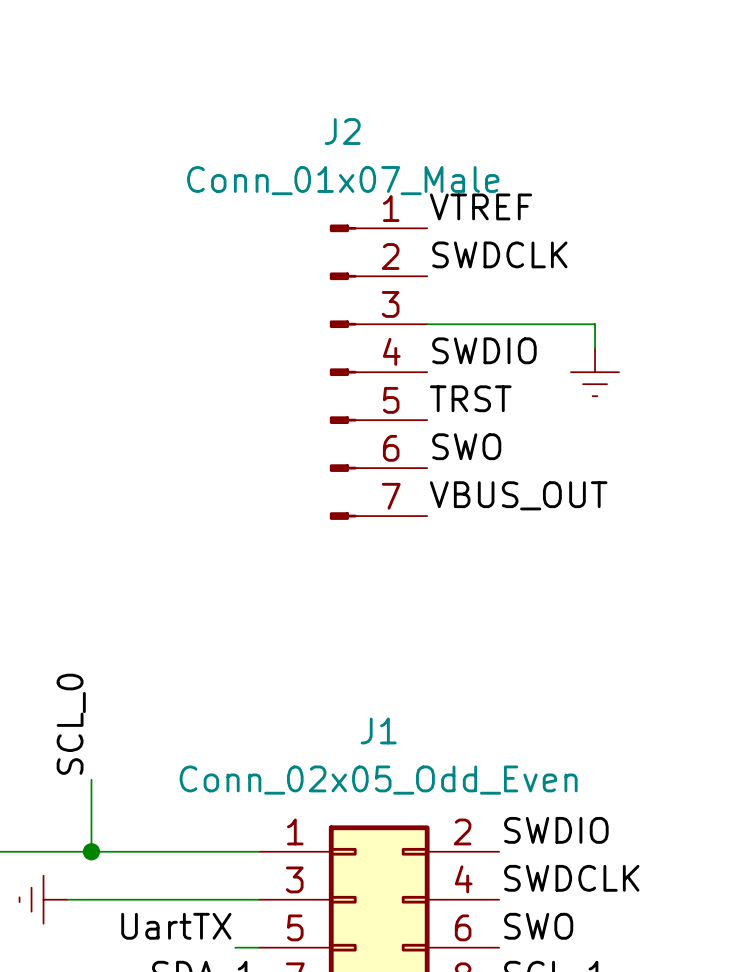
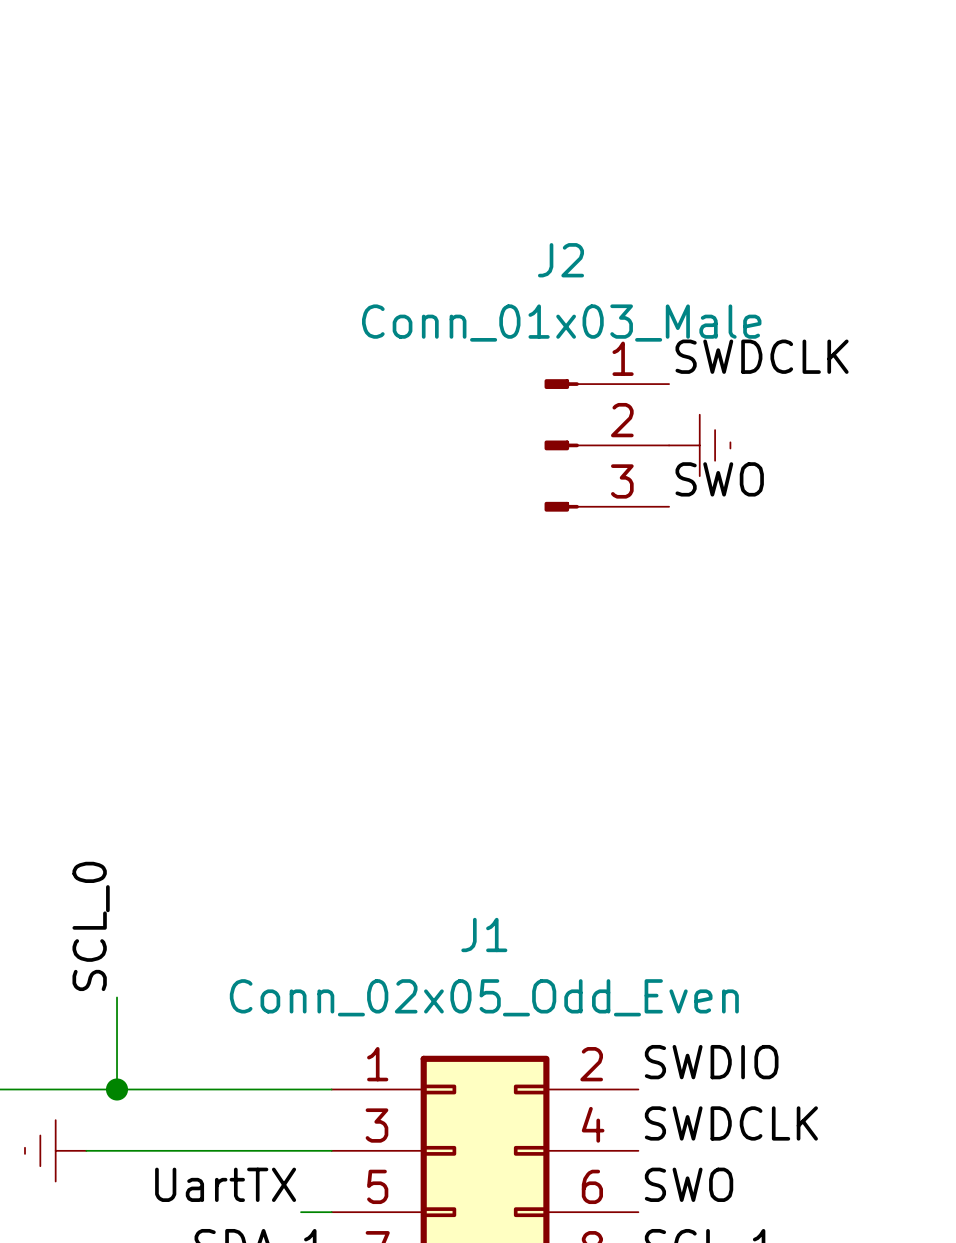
J2 name position: J2 (342, 131) -> J2 (561, 260)
J2 value: Conn_01x07_Male (343, 180) -> Conn_01x03_Male (561, 323)
label: VTREF (481, 206) -> none
J2 symbol: [329, 224, 428, 520] -> [544, 379, 670, 512]
label position: SWDCLK (499, 254) -> SWDCLK (762, 356)
wire: (427, 324) (595, 324) (595, 348) -> none
label: SWDIO (484, 350) -> none
power symbol rotation: 0° (595, 372) -> 90° counterclockwise (699, 445)
power symbol position: (595, 372) -> (699, 445)
label: TRST (470, 398) -> none
label position: SWO (466, 446) -> SWO (719, 479)
label: VBUS_OUT (518, 495) -> none

